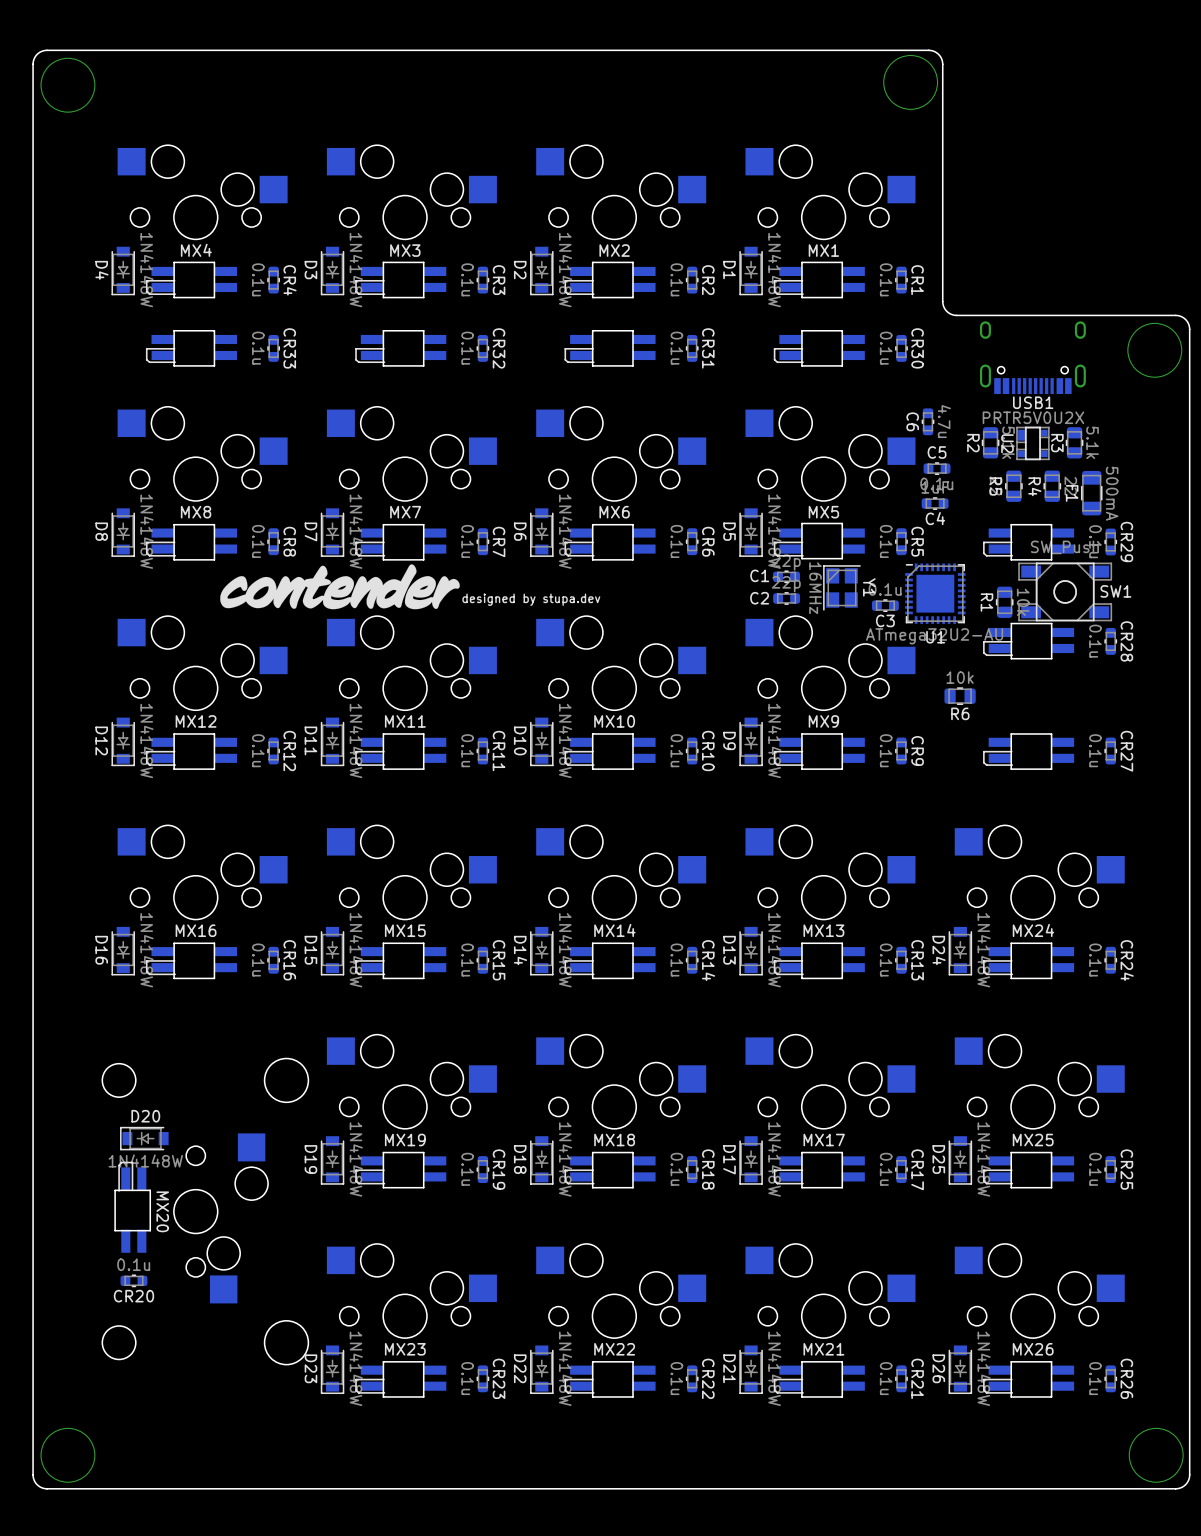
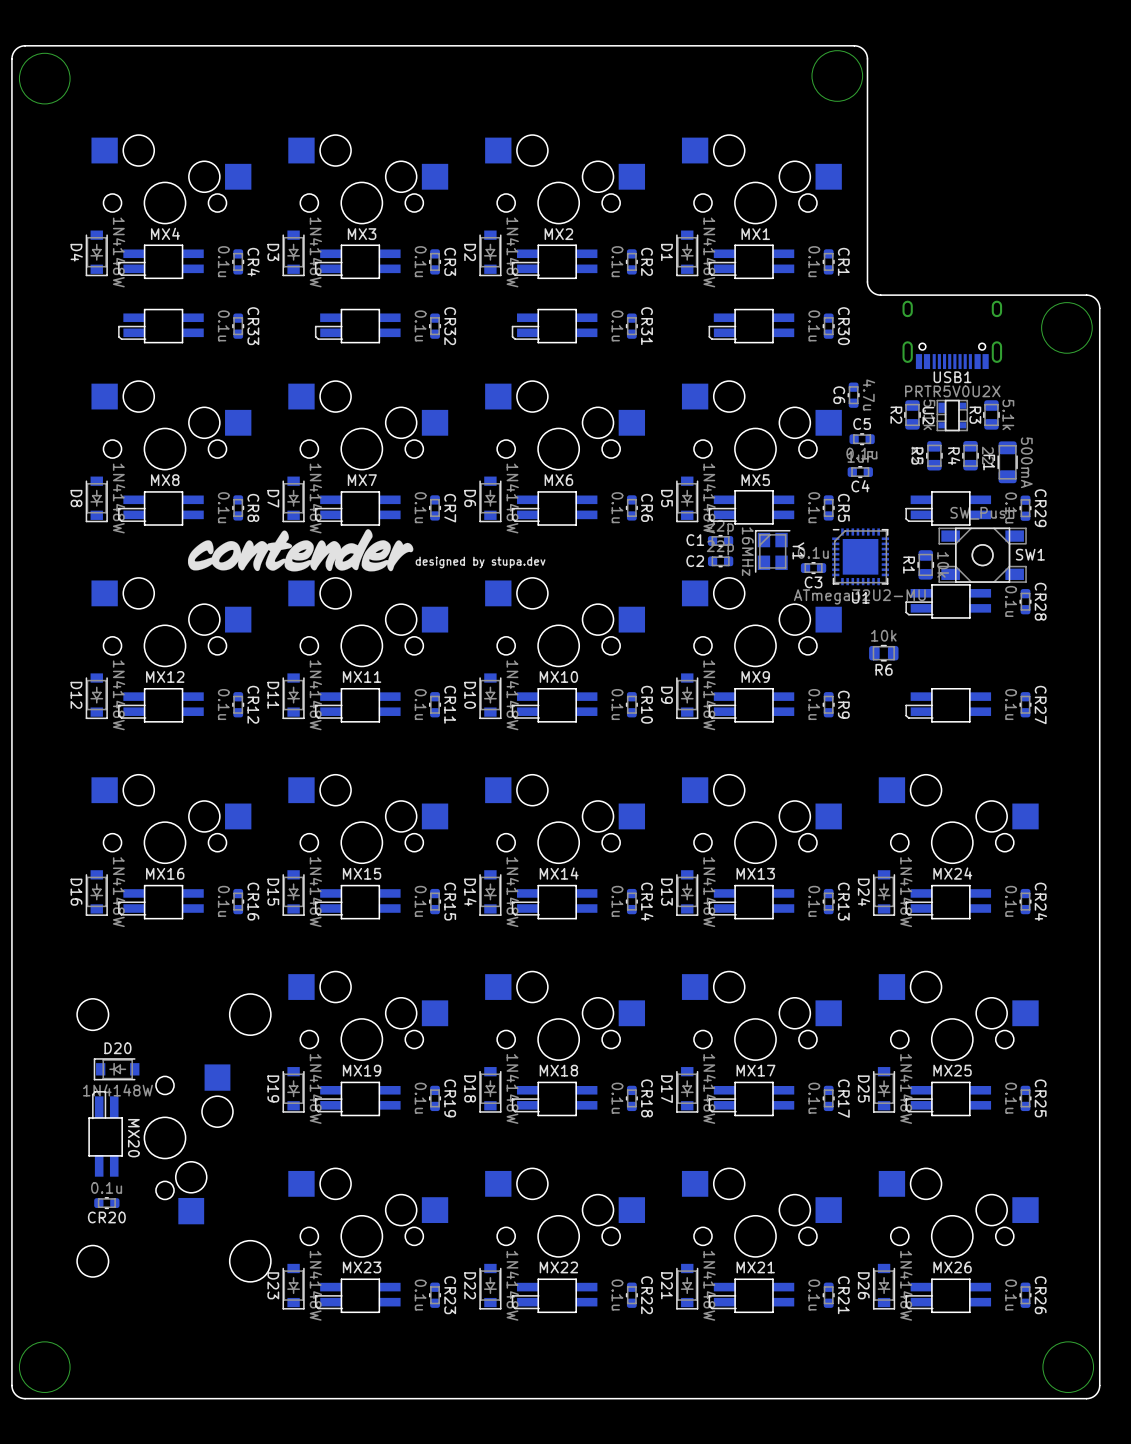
U1 value: ATmega32U2-AU (934, 636) -> ATmega32U2-MU (859, 596)

